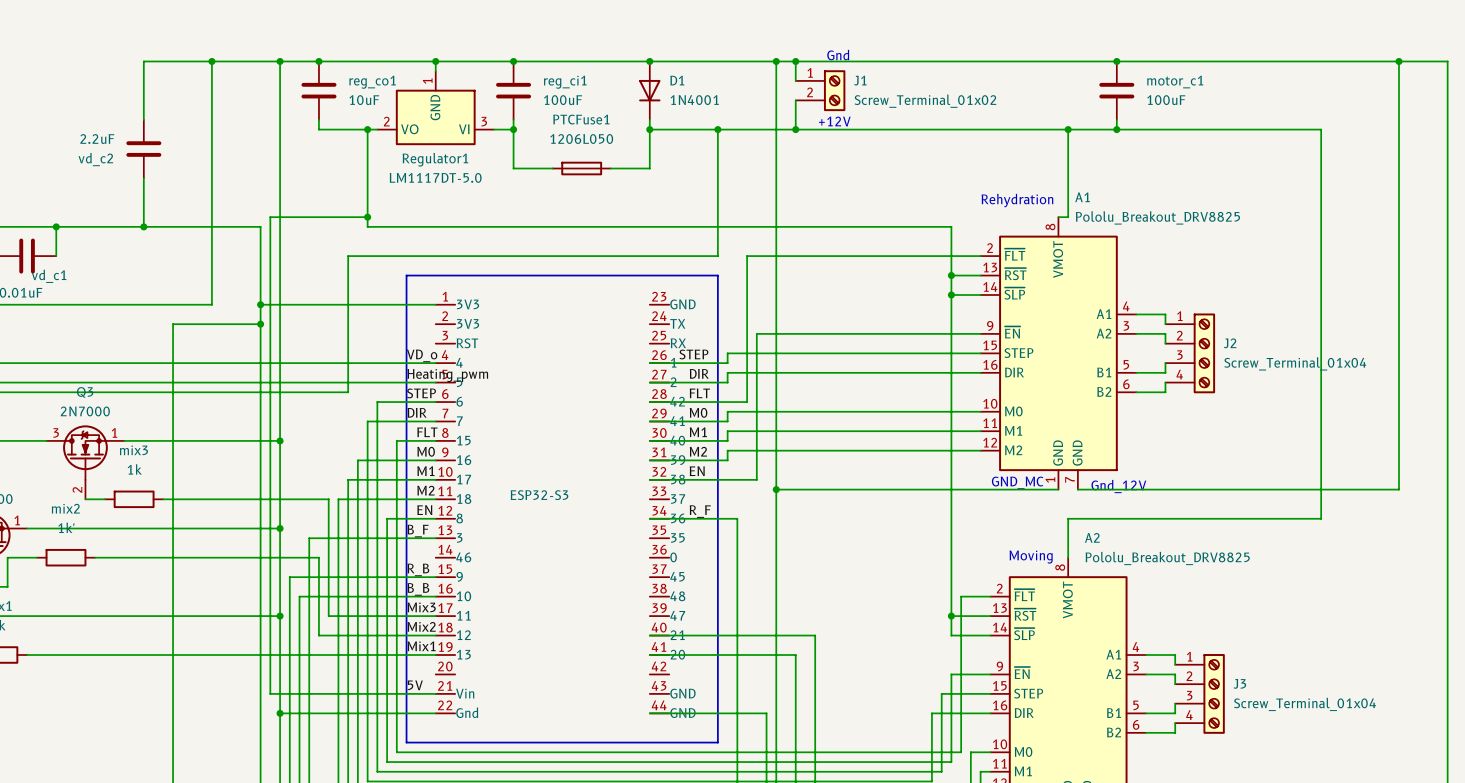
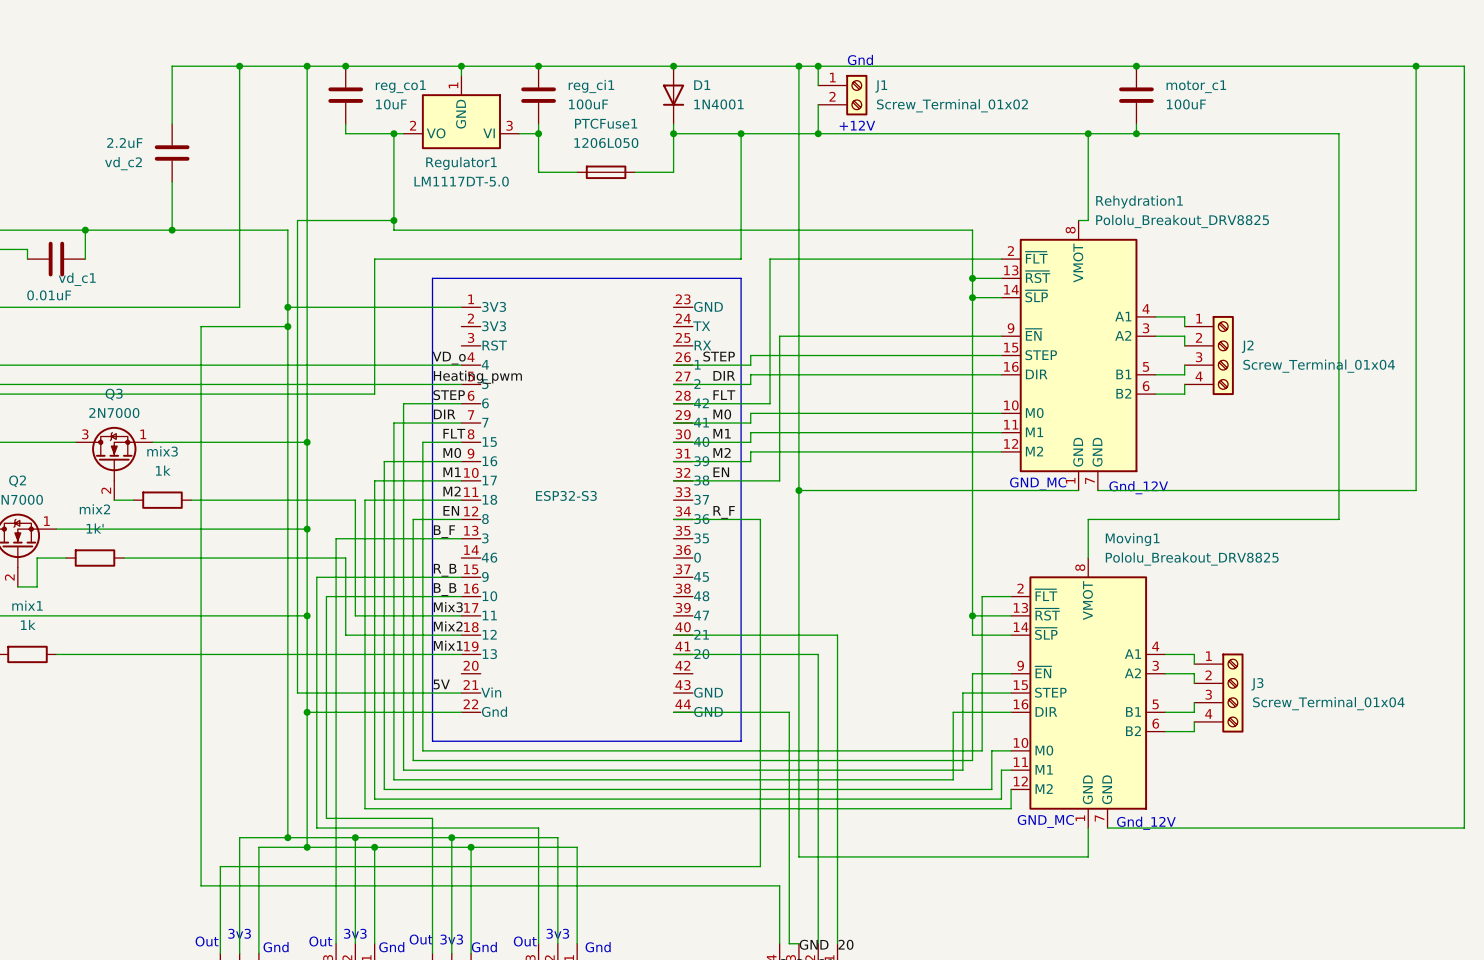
A1 name: A1 (1082, 197) -> Rehydration1 (1139, 202)
text: Rehydration (1017, 200) -> none
A2 name: A2 (1092, 537) -> Moving1 (1132, 539)
text: Moving (1031, 557) -> none

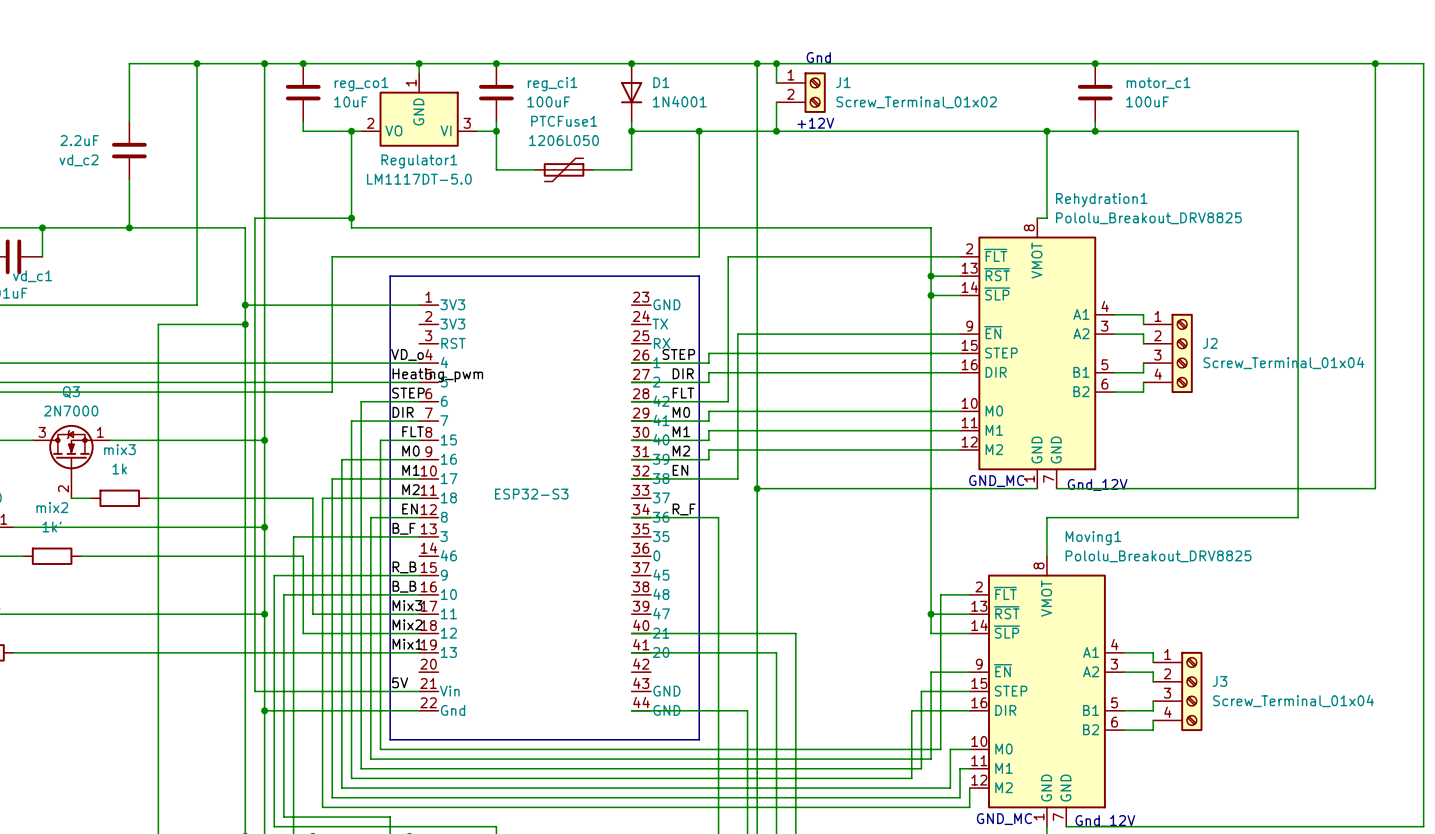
PTCFuse1 symbol: [577, 165, 636, 180] -> [535, 158, 594, 182]

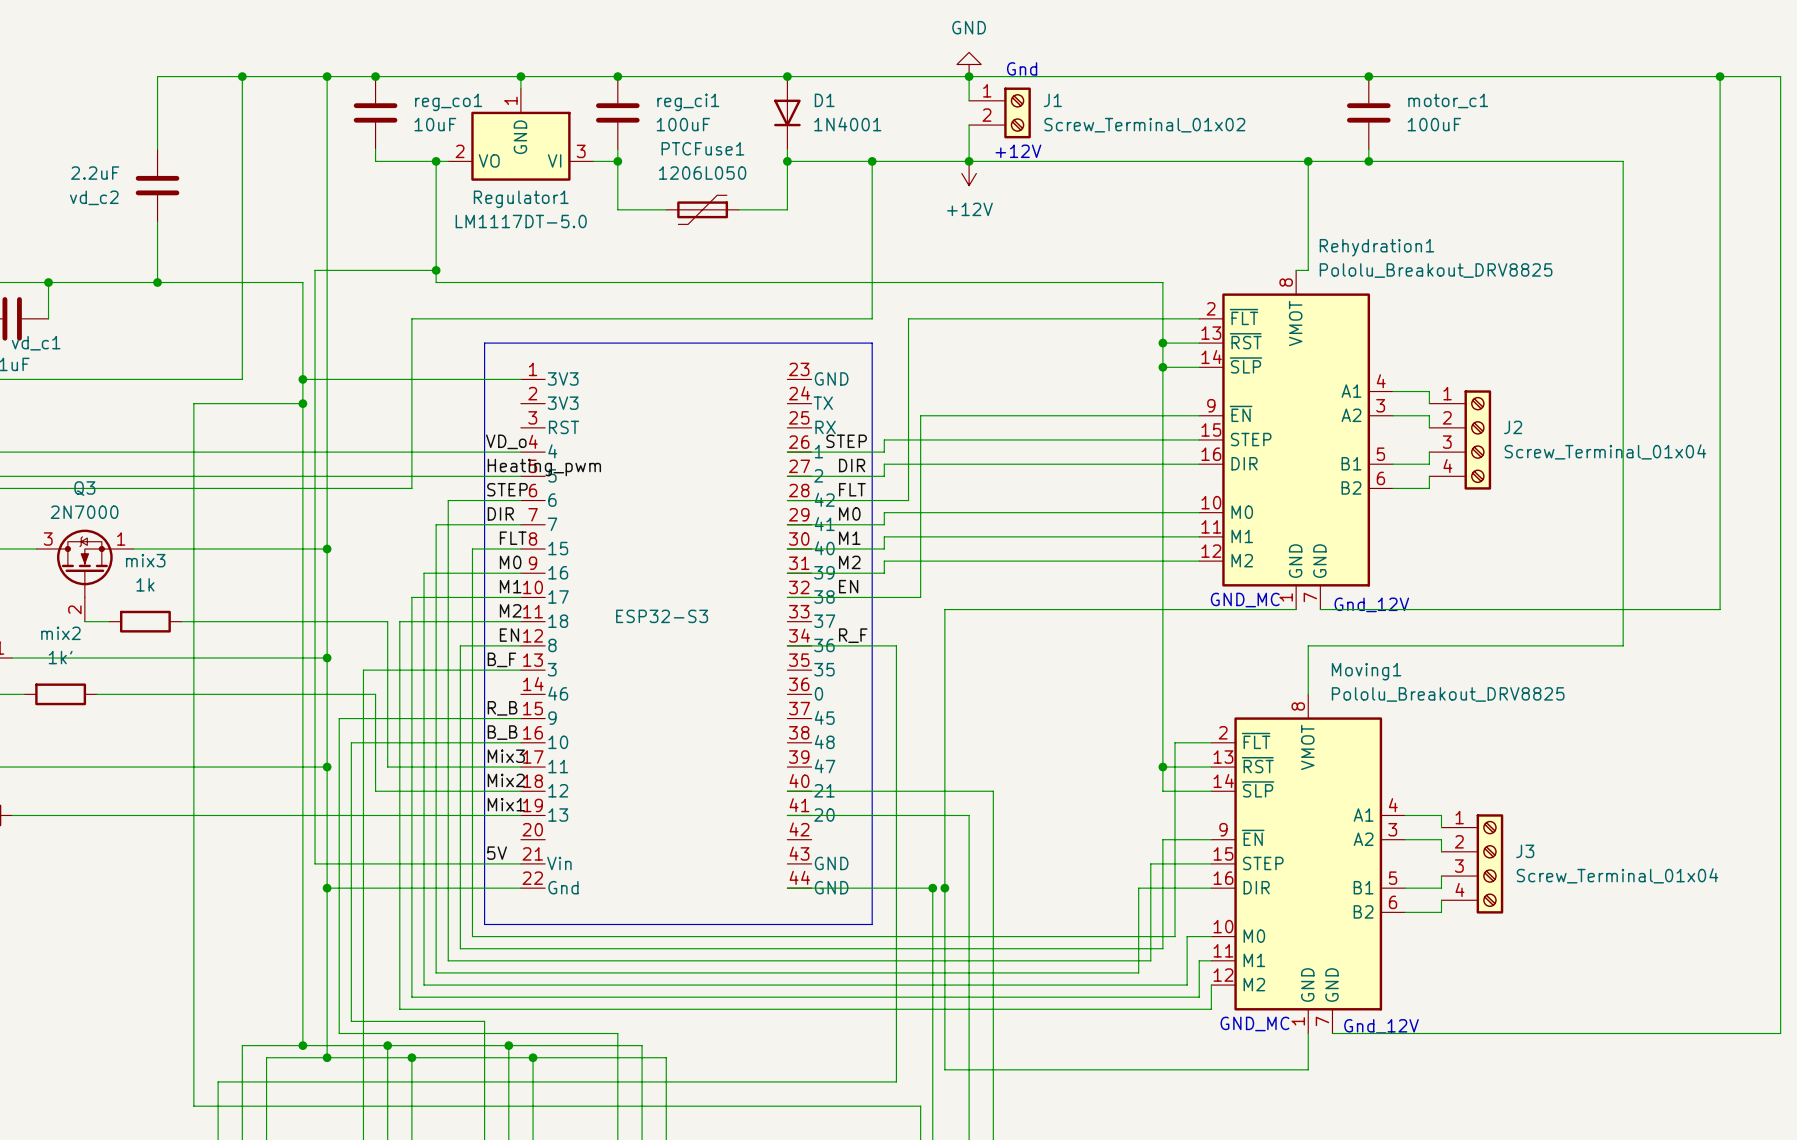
power symbol: none -> GND (969, 64)
wire: (757, 63) (757, 488) -> none
junction: (757, 63) -> none
power symbol: none -> +12V (969, 173)
junction: (757, 488) -> none
junction: none -> (932, 888)
junction: none -> (944, 888)

